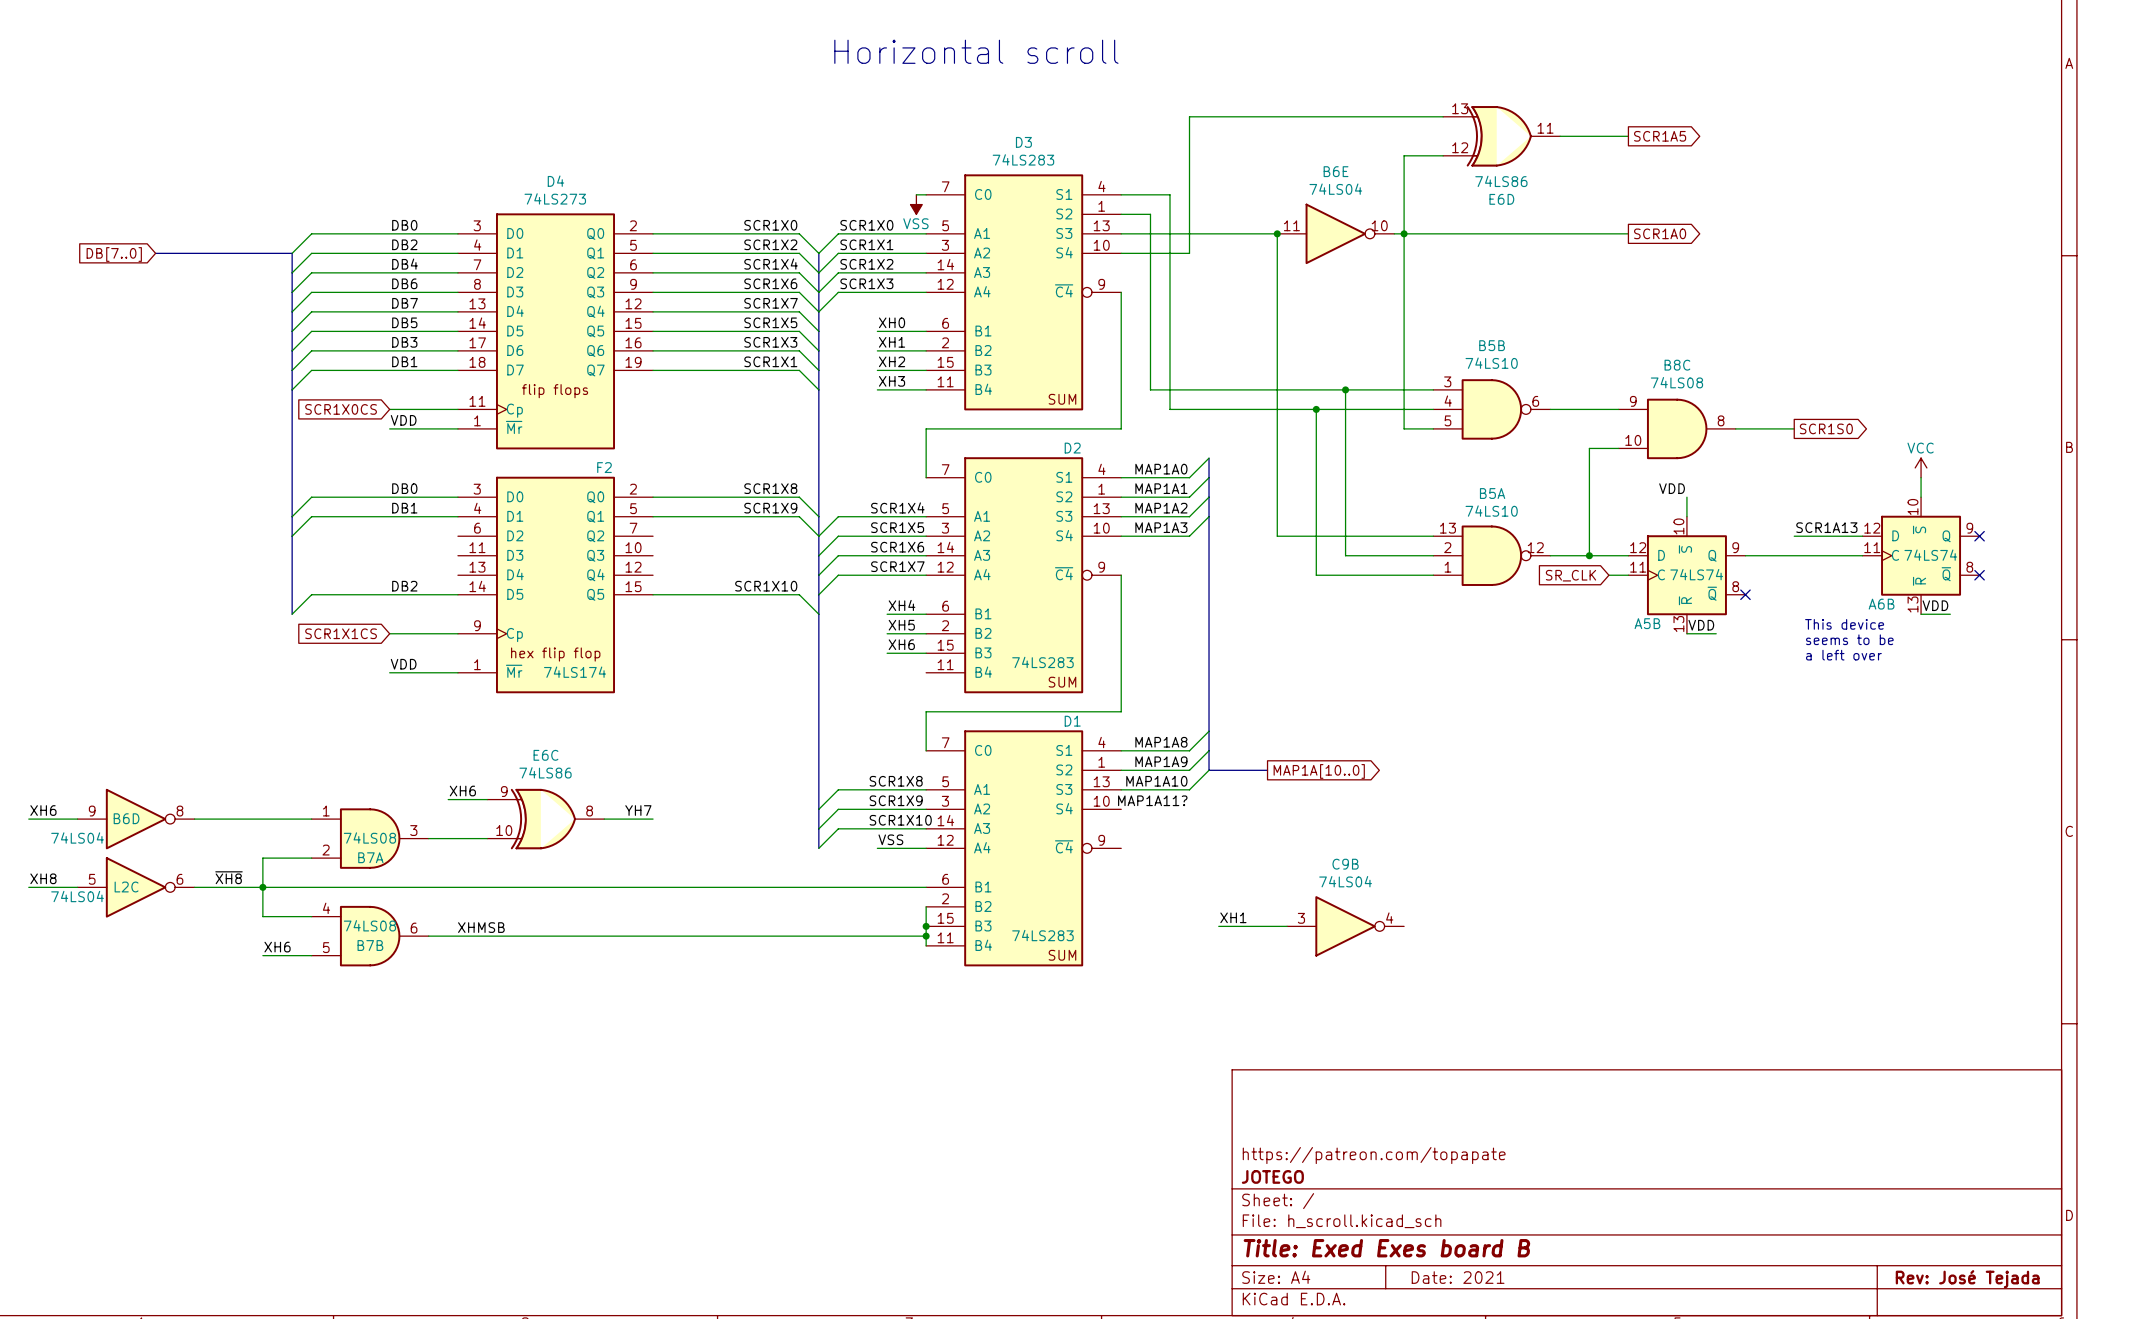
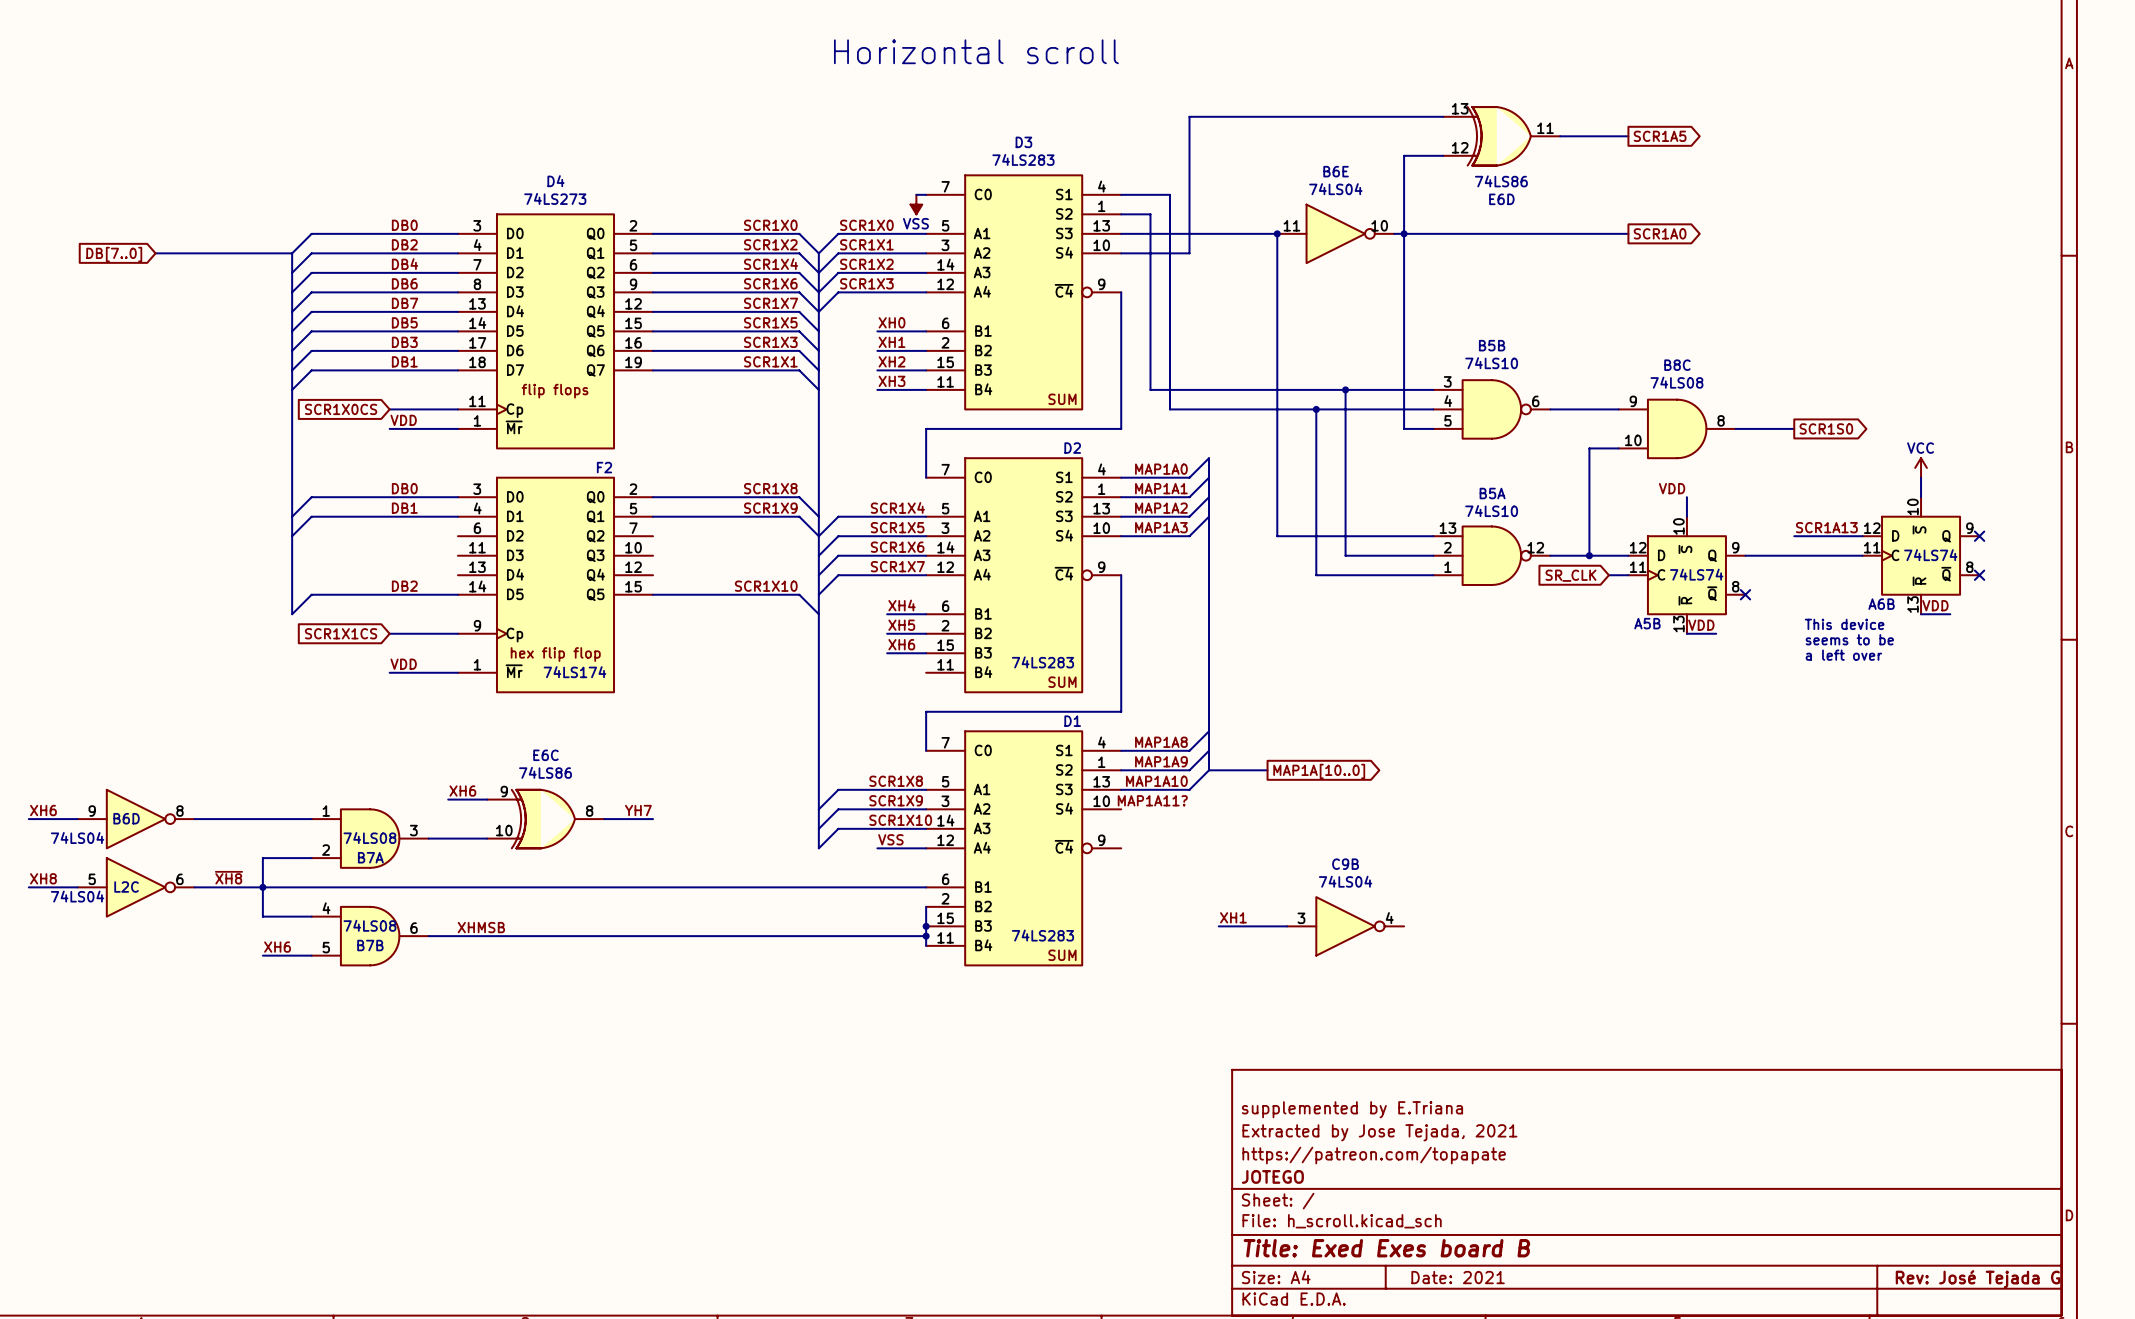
title block: none -> supplemented by E.Triana (1352, 1109)
title block: none -> Extracted by Jose Tejada, 2021 (1379, 1132)
title block: Rev: José Tejada (1967, 1279) -> Rev: José Tejada G (1978, 1279)

